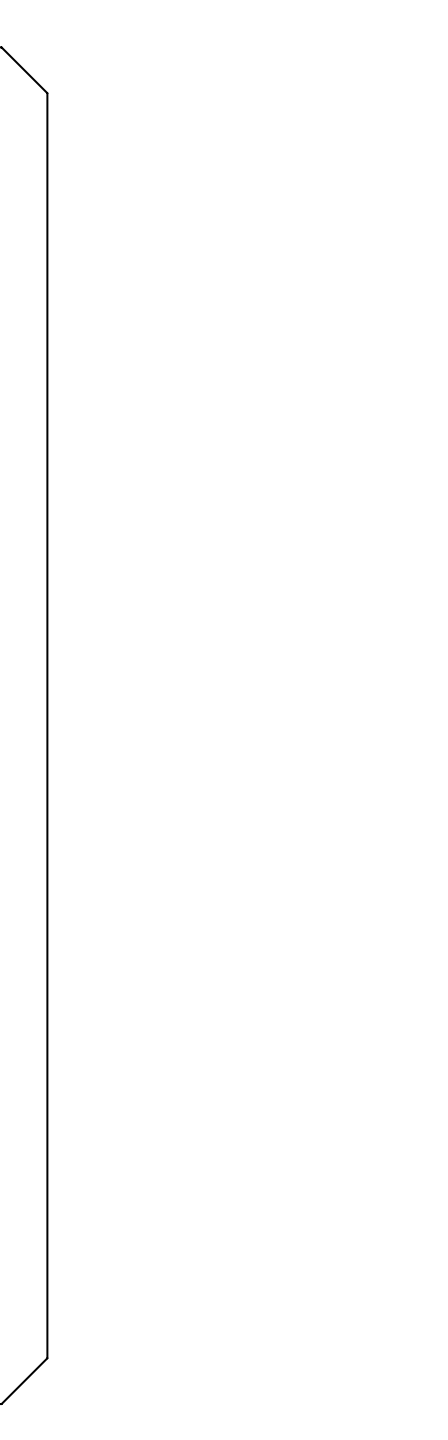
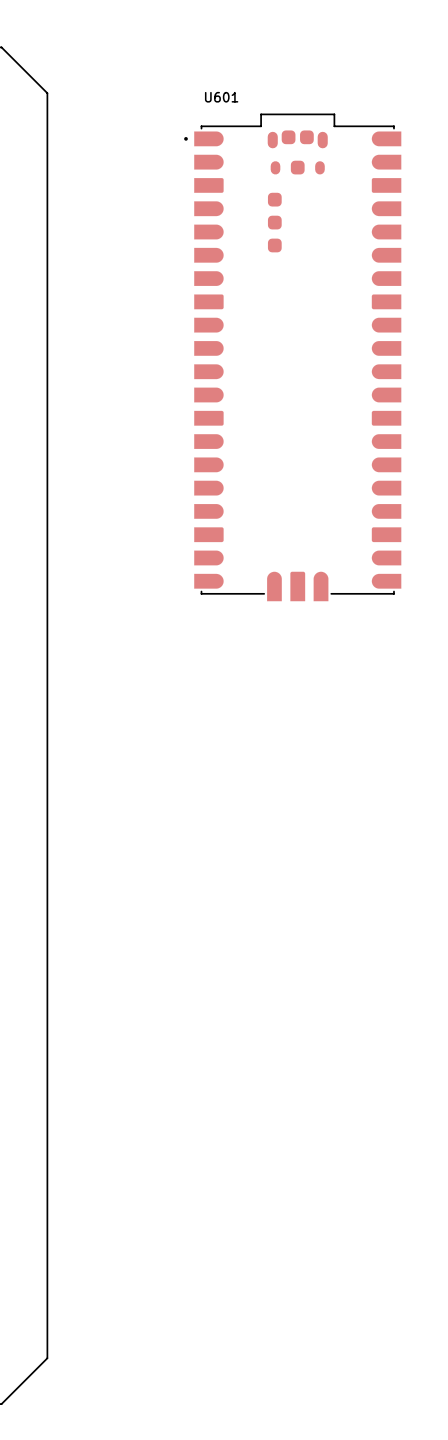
U601: none -> (292, 357)

